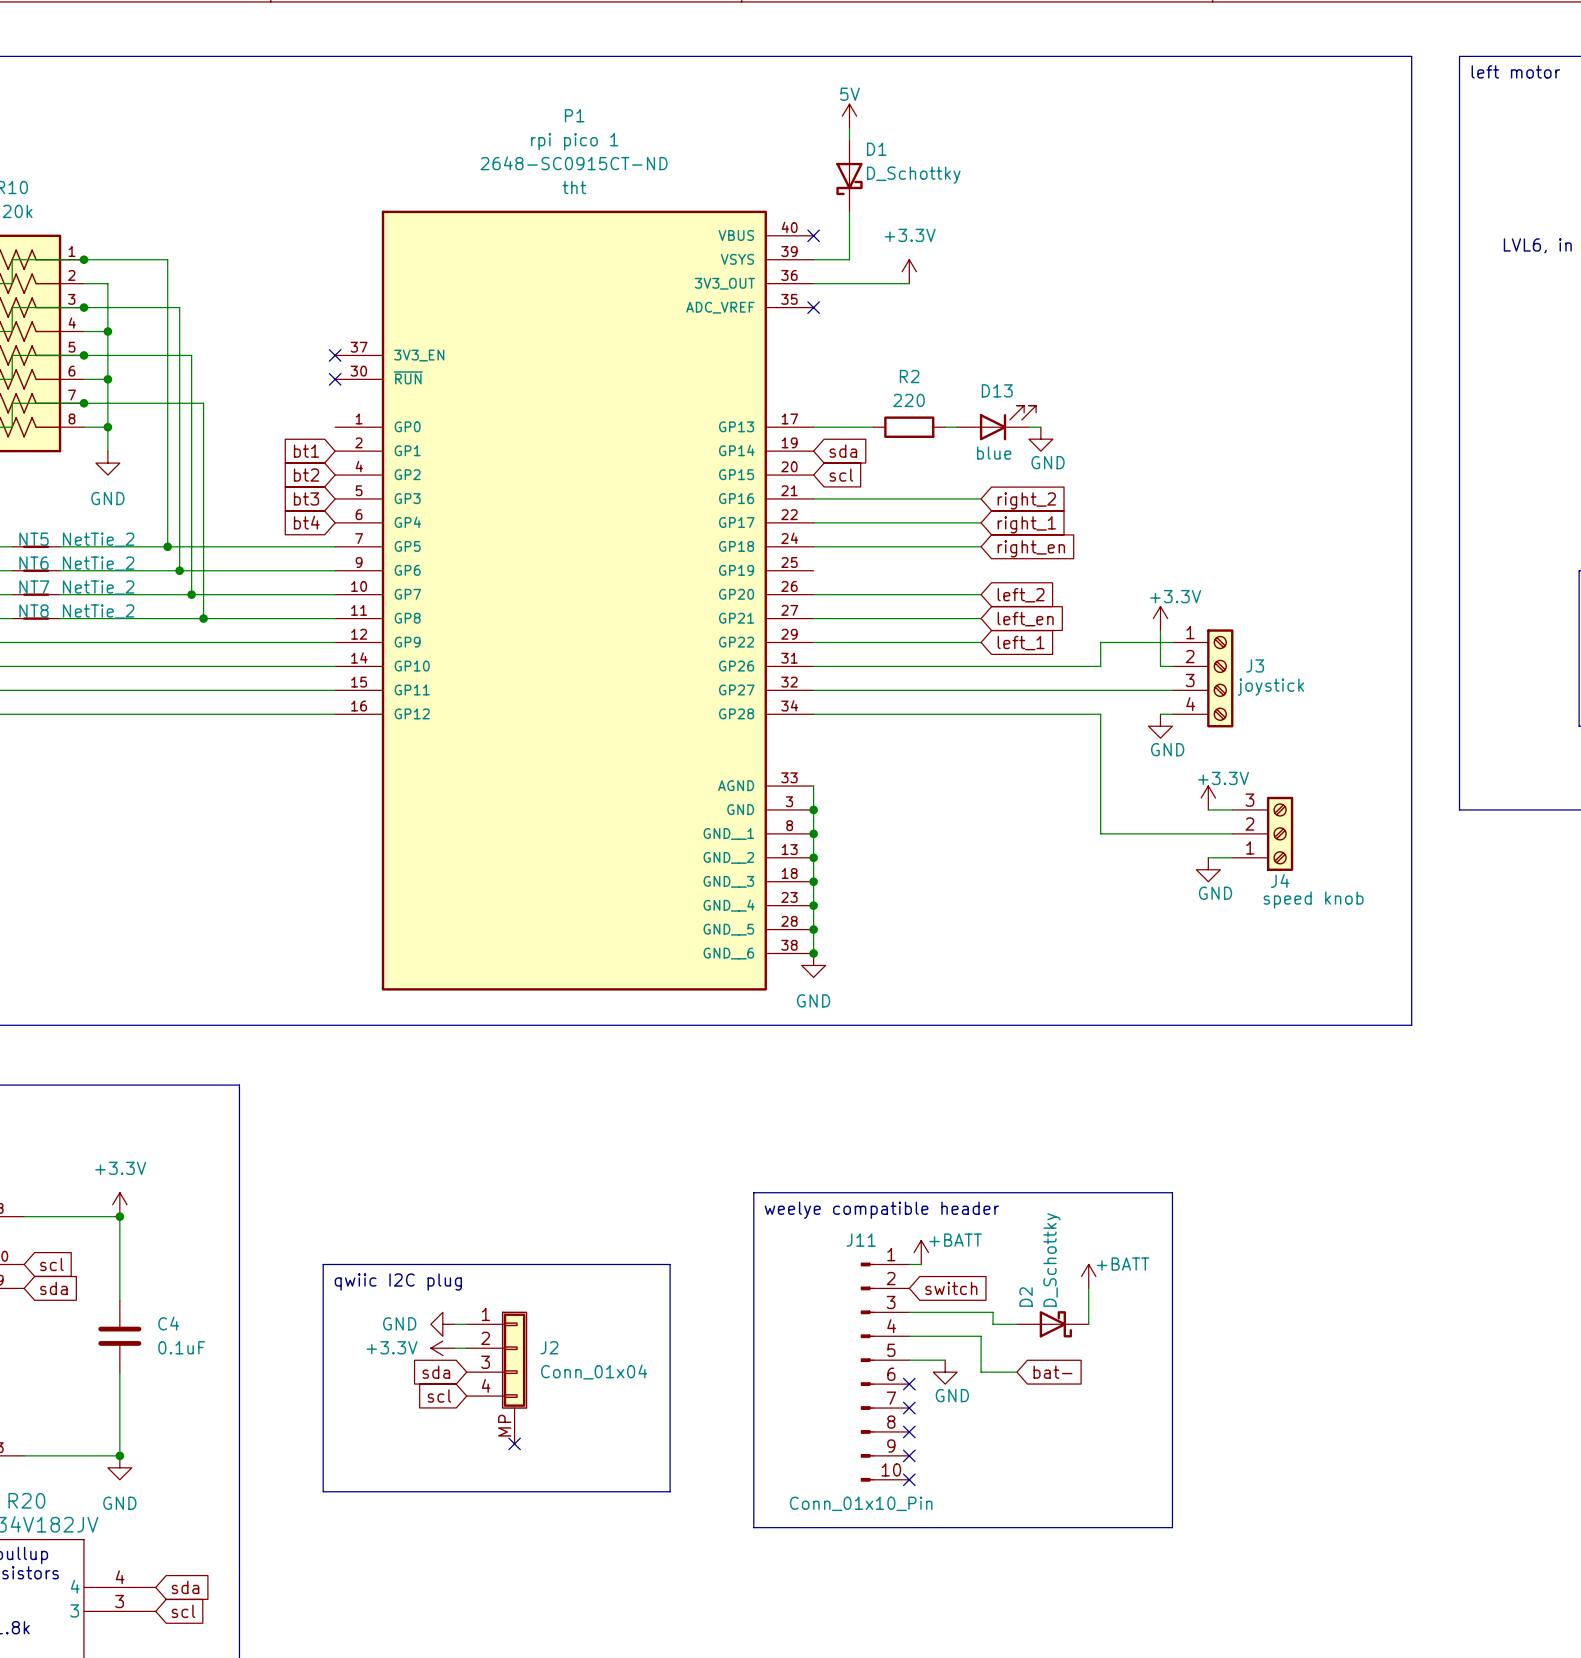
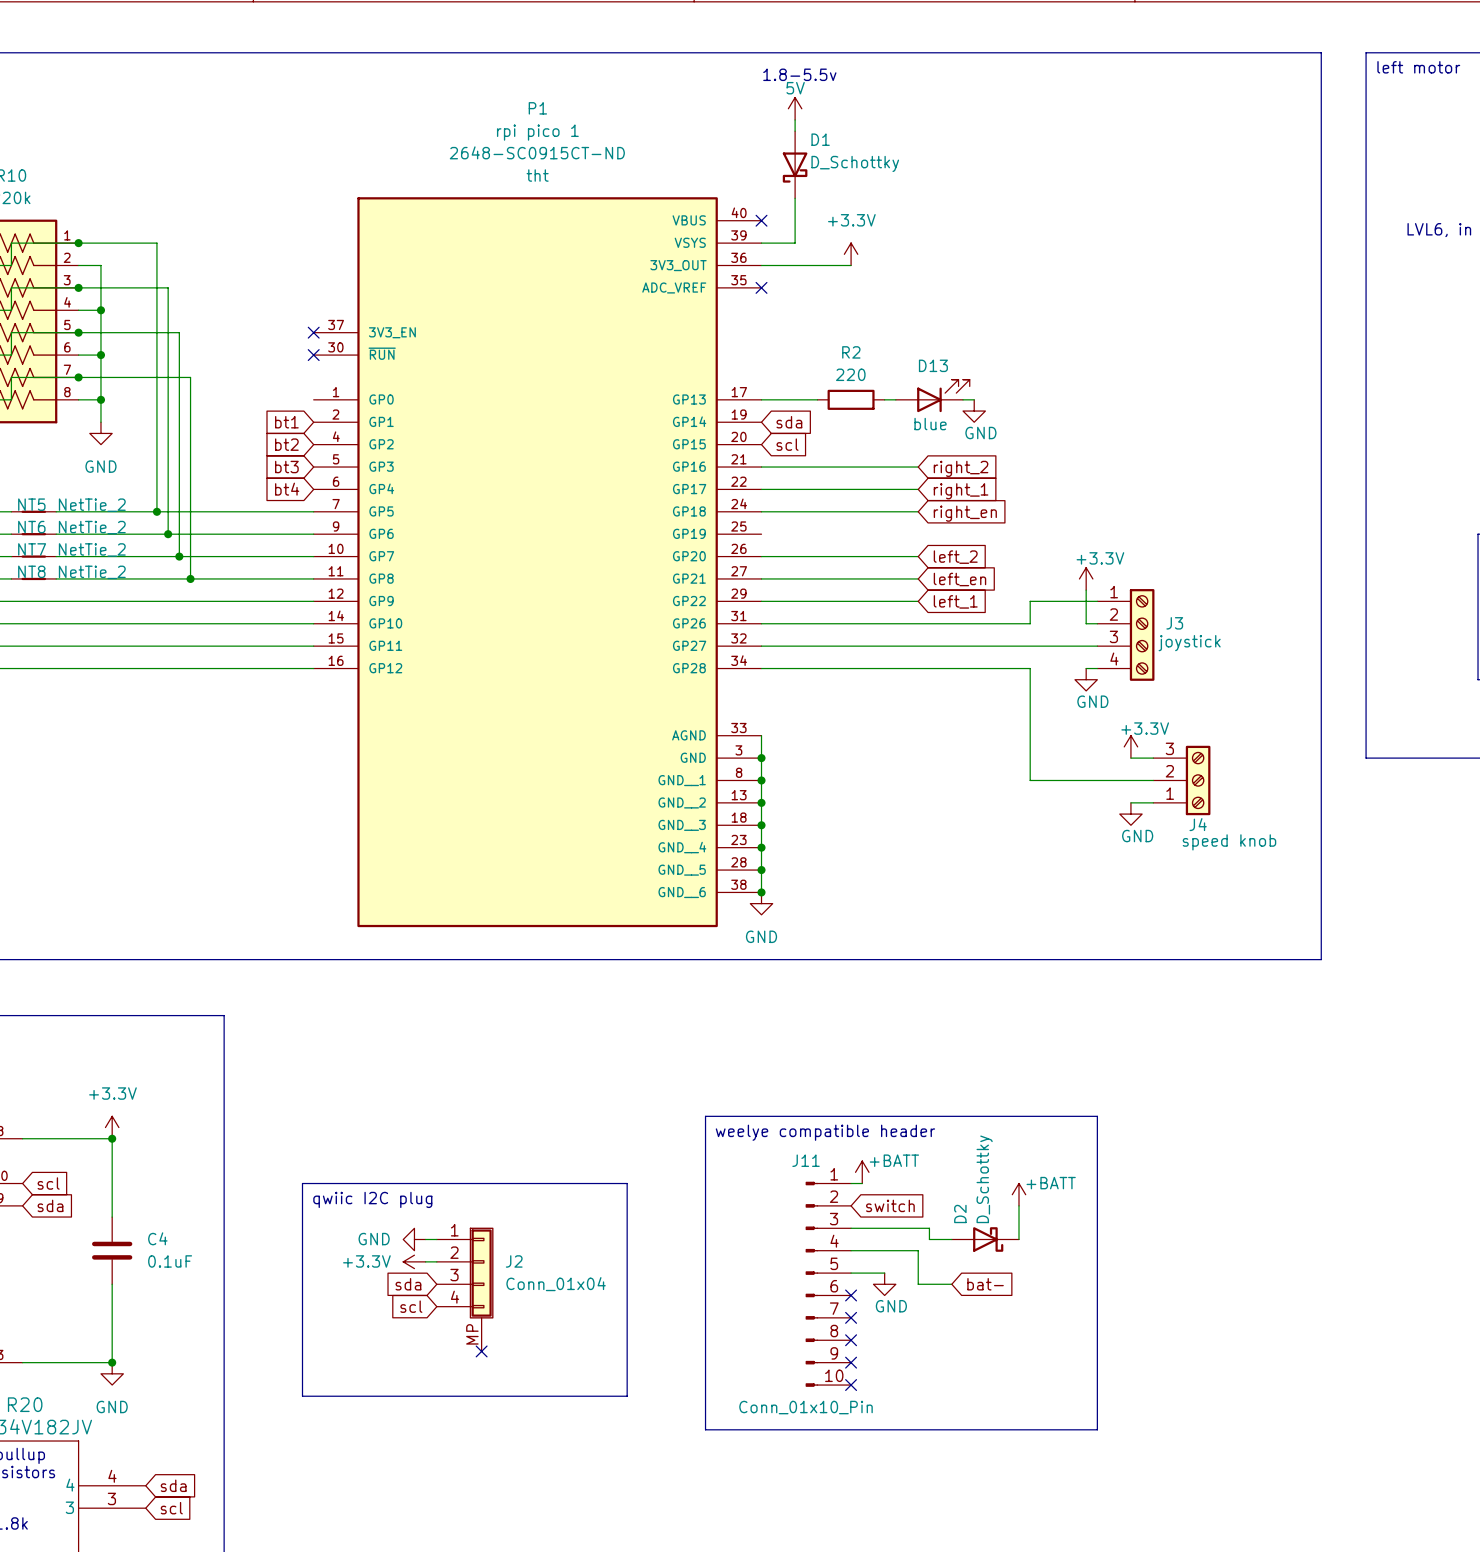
text: none -> 1.8-5.5v (799, 74)

